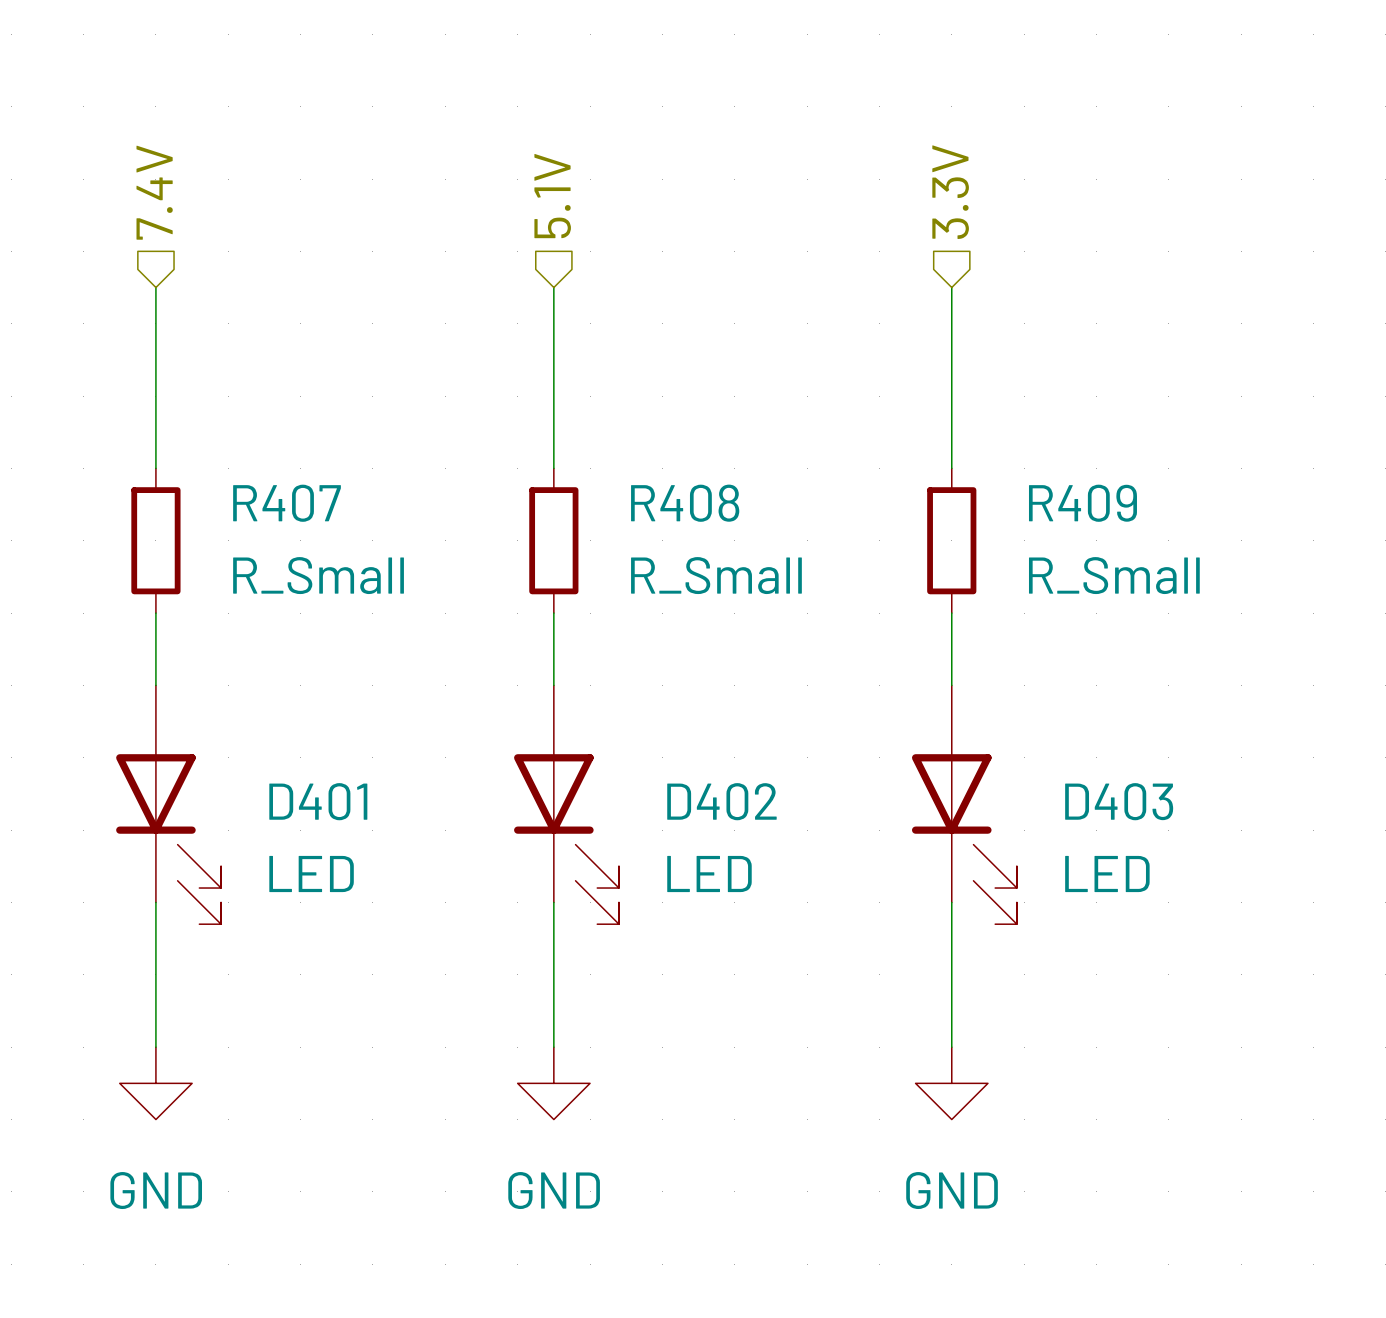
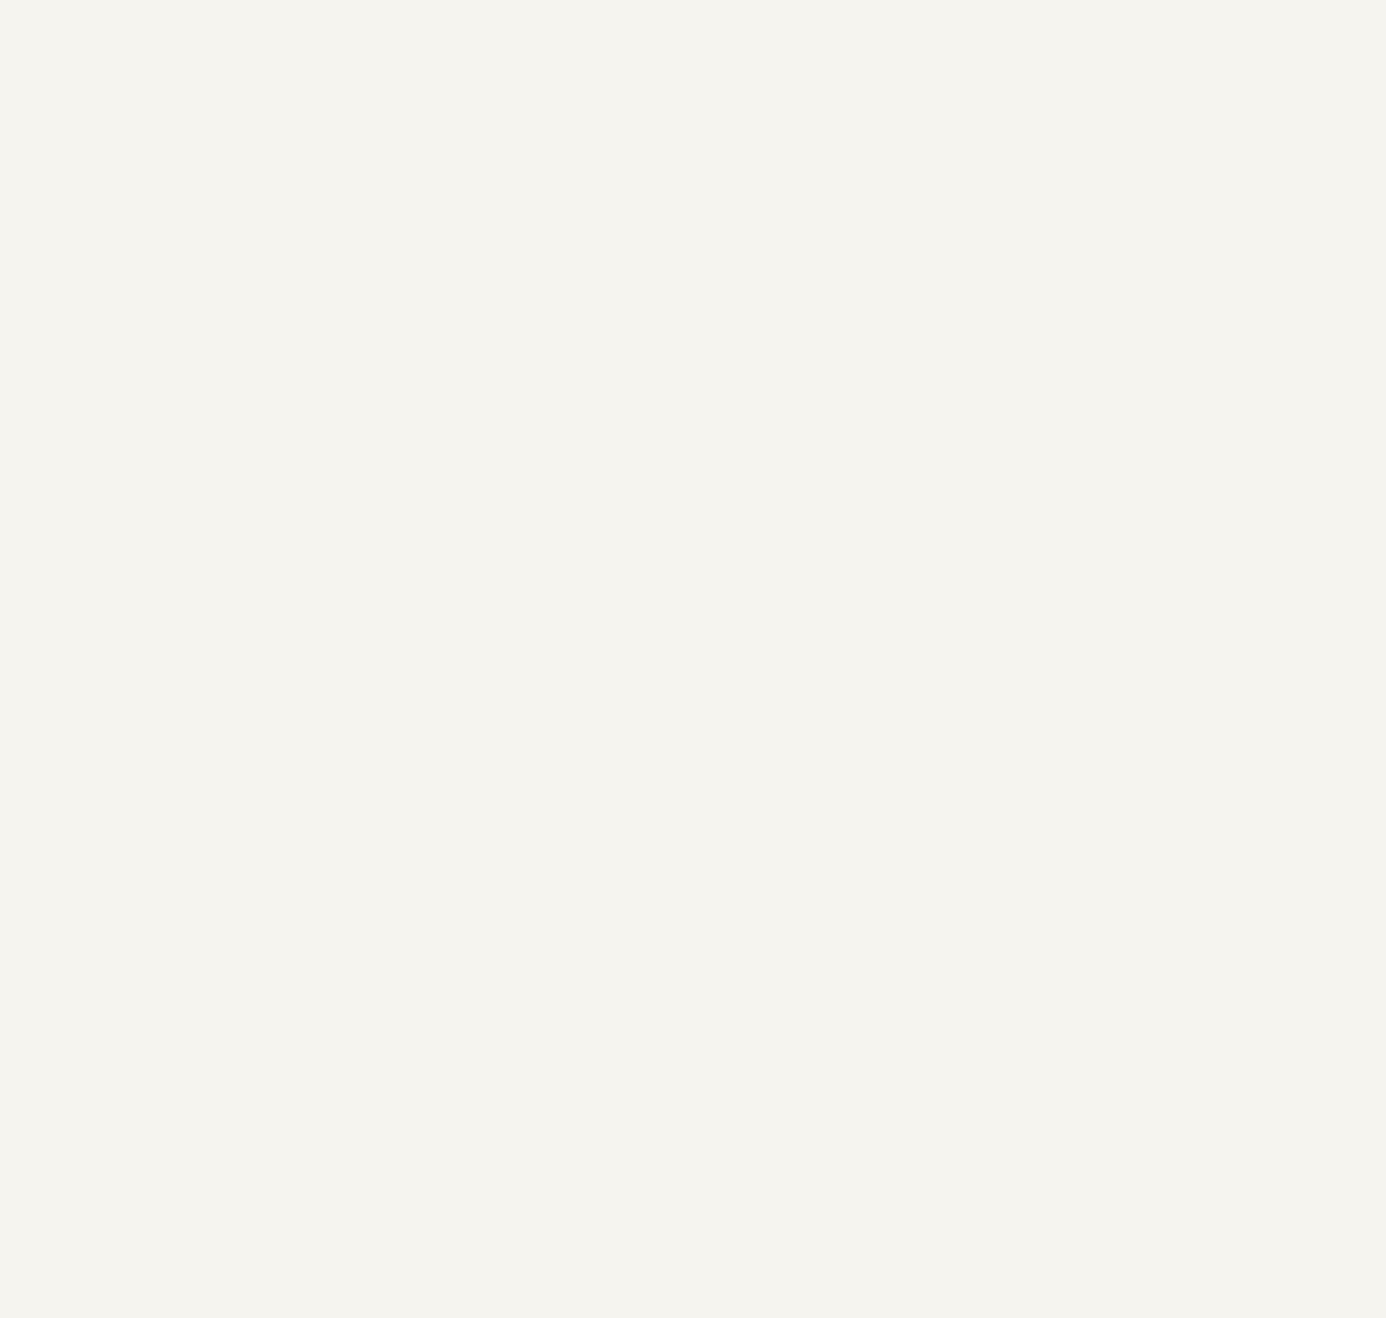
hierarchical label: 7.4V (154, 192) -> none
hierarchical label: 3.3V (950, 192) -> none
hierarchical label: 5.1V (552, 196) -> none
wire: (155, 287) (155, 468) -> none
wire: (553, 287) (553, 468) -> none
wire: (951, 287) (951, 468) -> none
R407: R_Small (155, 540) -> none
R408: R_Small (553, 540) -> none
R409: R_Small (951, 540) -> none
wire: (155, 613) (155, 685) -> none
wire: (553, 613) (553, 685) -> none
wire: (951, 613) (951, 685) -> none
D401: LED (168, 804) -> none
D402: LED (566, 804) -> none
D403: LED (964, 804) -> none
wire: (155, 902) (155, 1047) -> none
wire: (553, 902) (553, 1047) -> none
wire: (951, 902) (951, 1047) -> none
power symbol: GND (155, 1083) -> none
power symbol: GND (553, 1083) -> none
power symbol: GND (951, 1083) -> none

